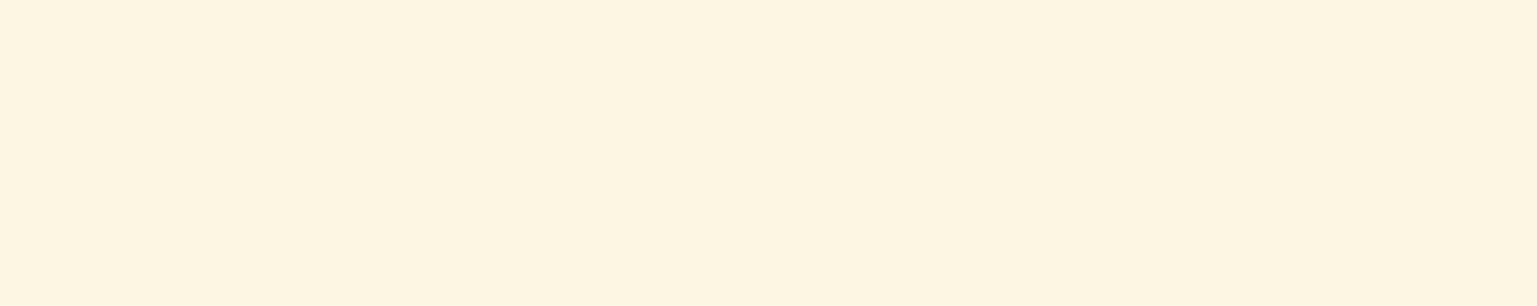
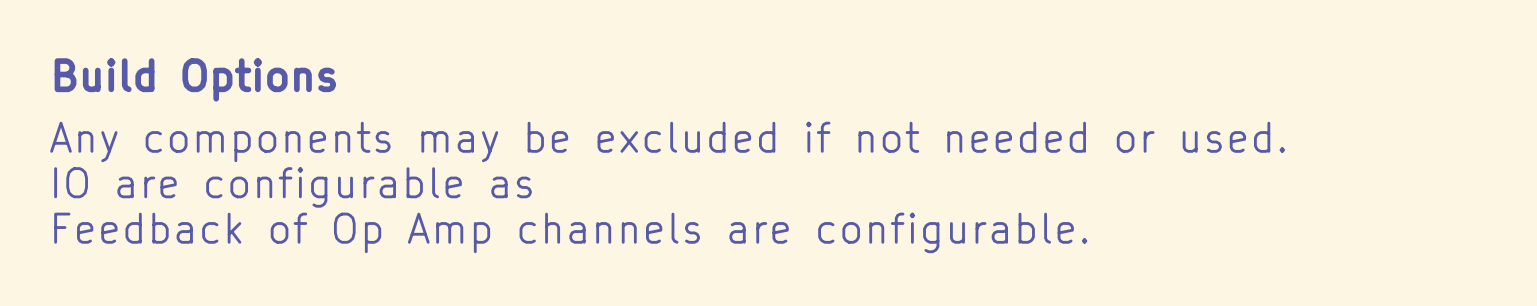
text: none -> Build Options (195, 79)
text: none -> Any components may be excluded if not needed or used. (667, 141)
text: none -> IO are configurable as (293, 187)
text: none -> Feedback of Op Amp channels are configurable. (570, 232)

